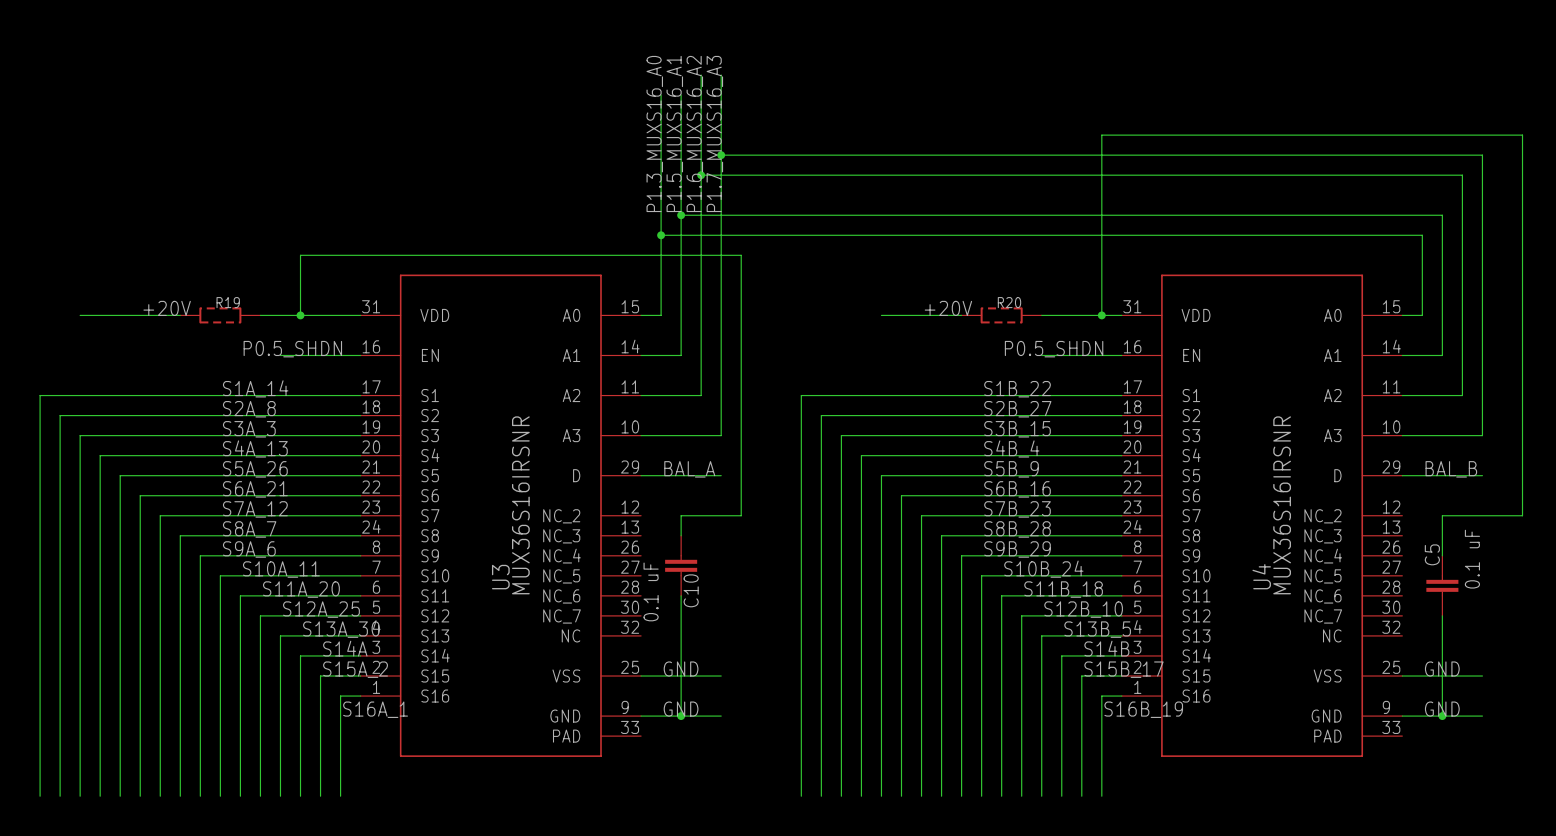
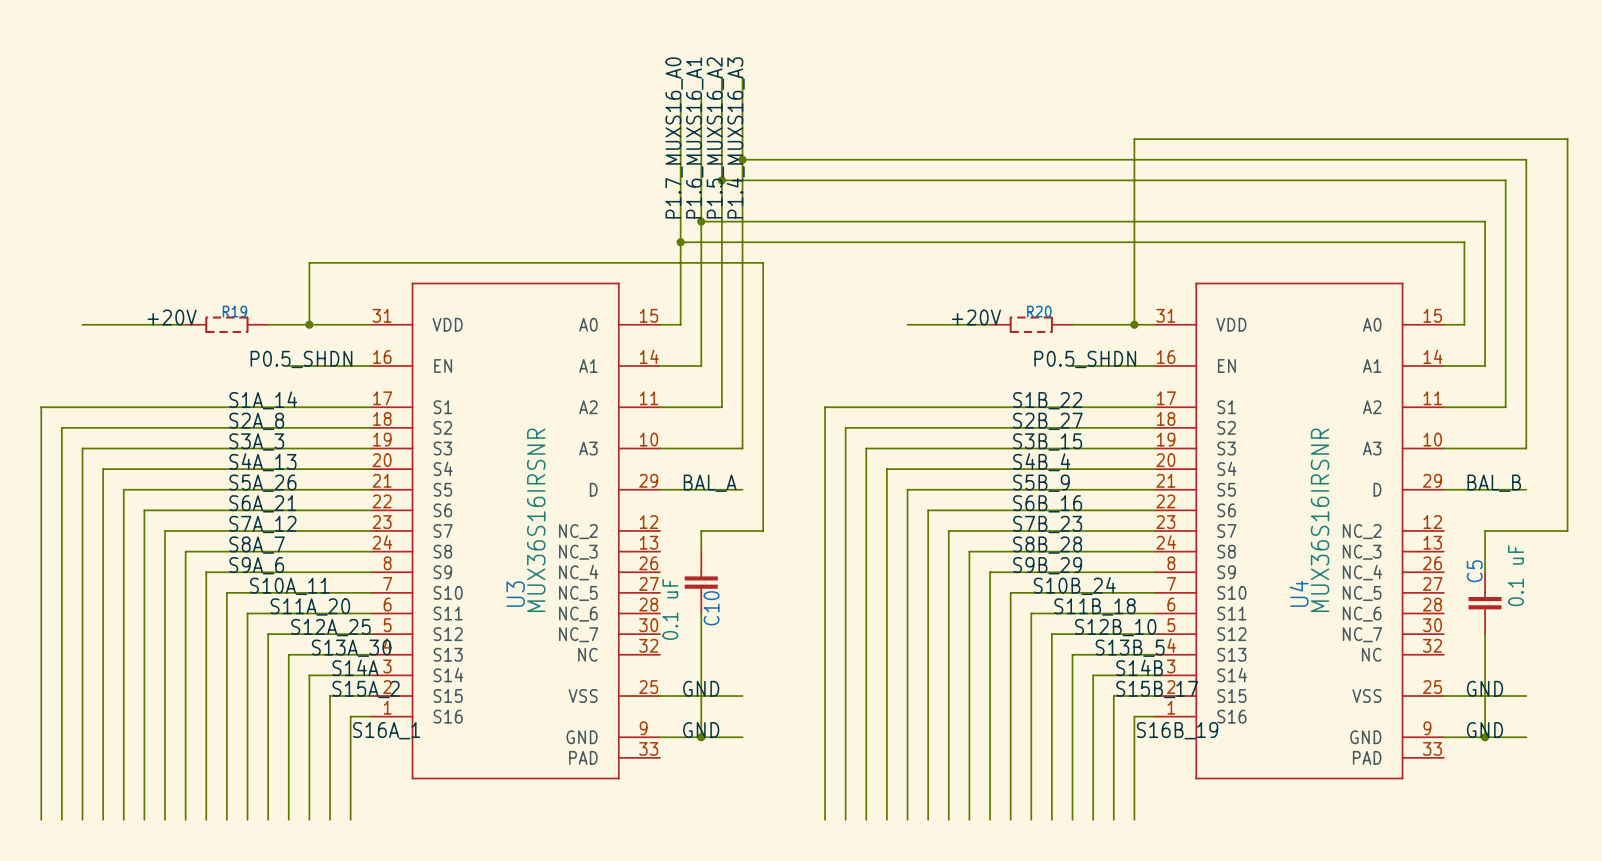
label: P1.3_MUXS16_A0 (654, 133) -> P1.7_MUXS16_A0 (674, 137)
label: P1.5_MUXS16_A1 (674, 133) -> P1.6_MUXS16_A1 (694, 137)
label: P1.6_MUXS16_A2 (694, 133) -> P1.5_MUXS16_A2 (715, 137)
label: P1.7_MUXS16_A3 (714, 133) -> P1.4_MUXS16_A3 (735, 137)

